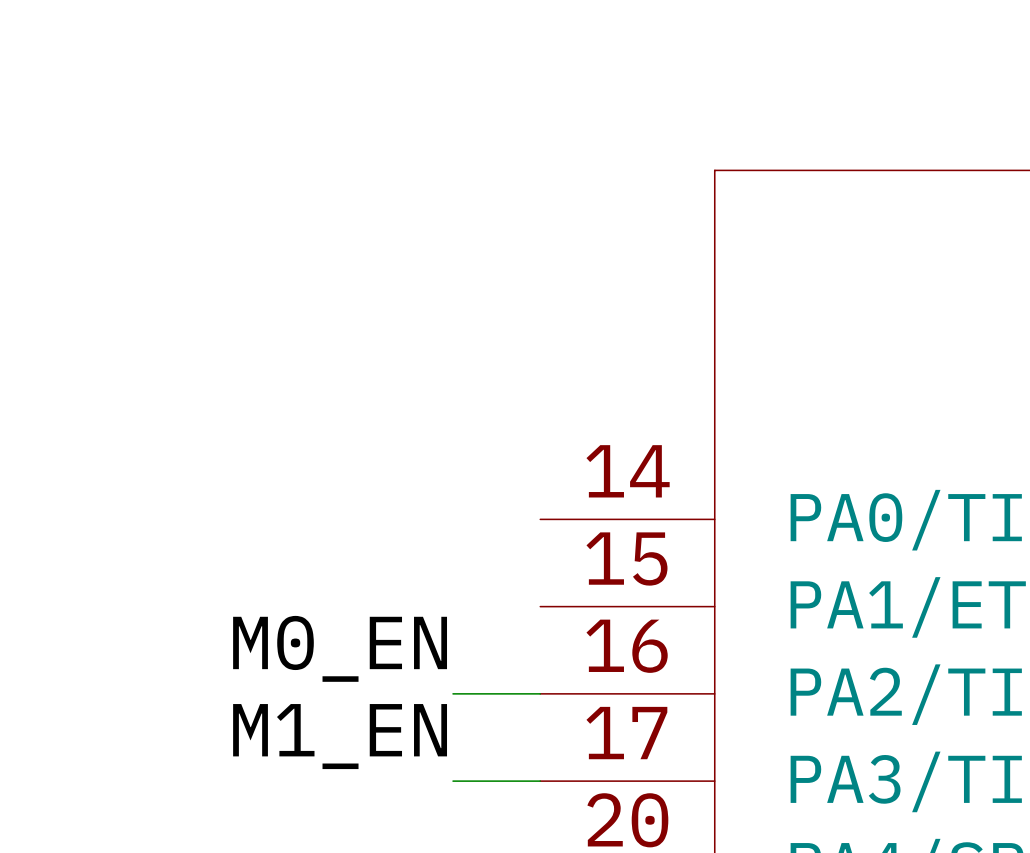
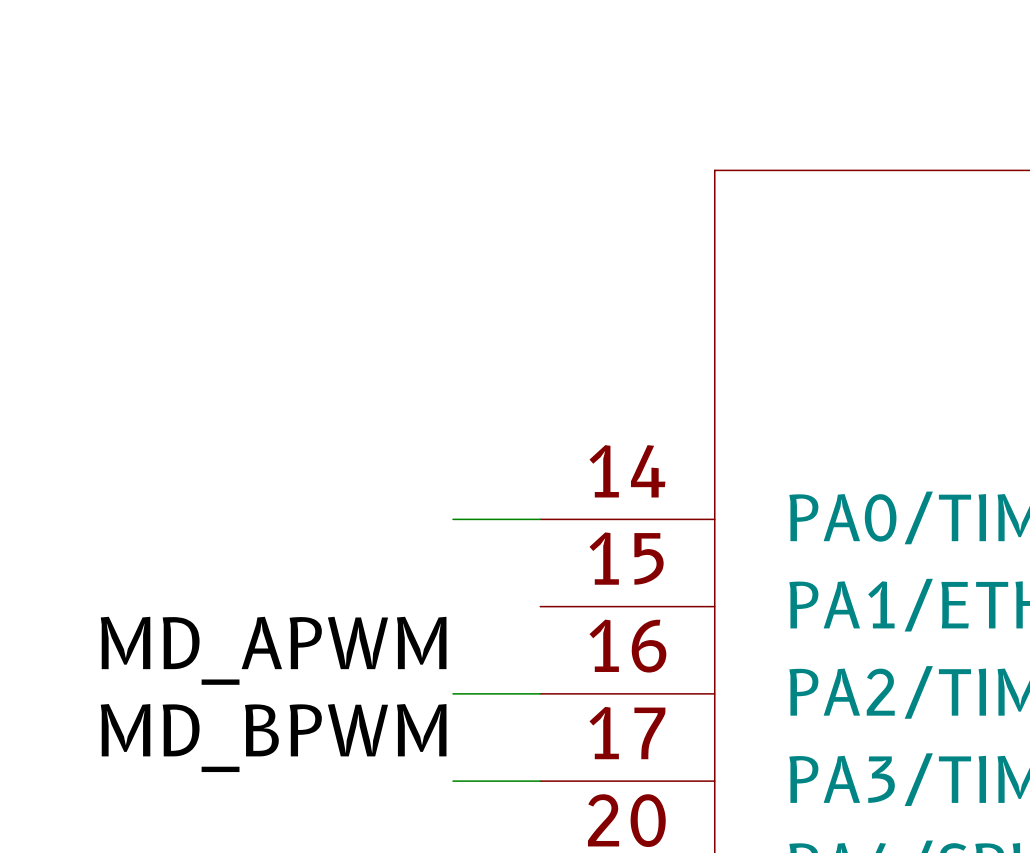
wire: none -> (453, 519) (540, 519)
label: M0_EN (340, 648) -> MD_APWM (273, 650)
label: M1_EN (340, 736) -> MD_BPWM (273, 738)

